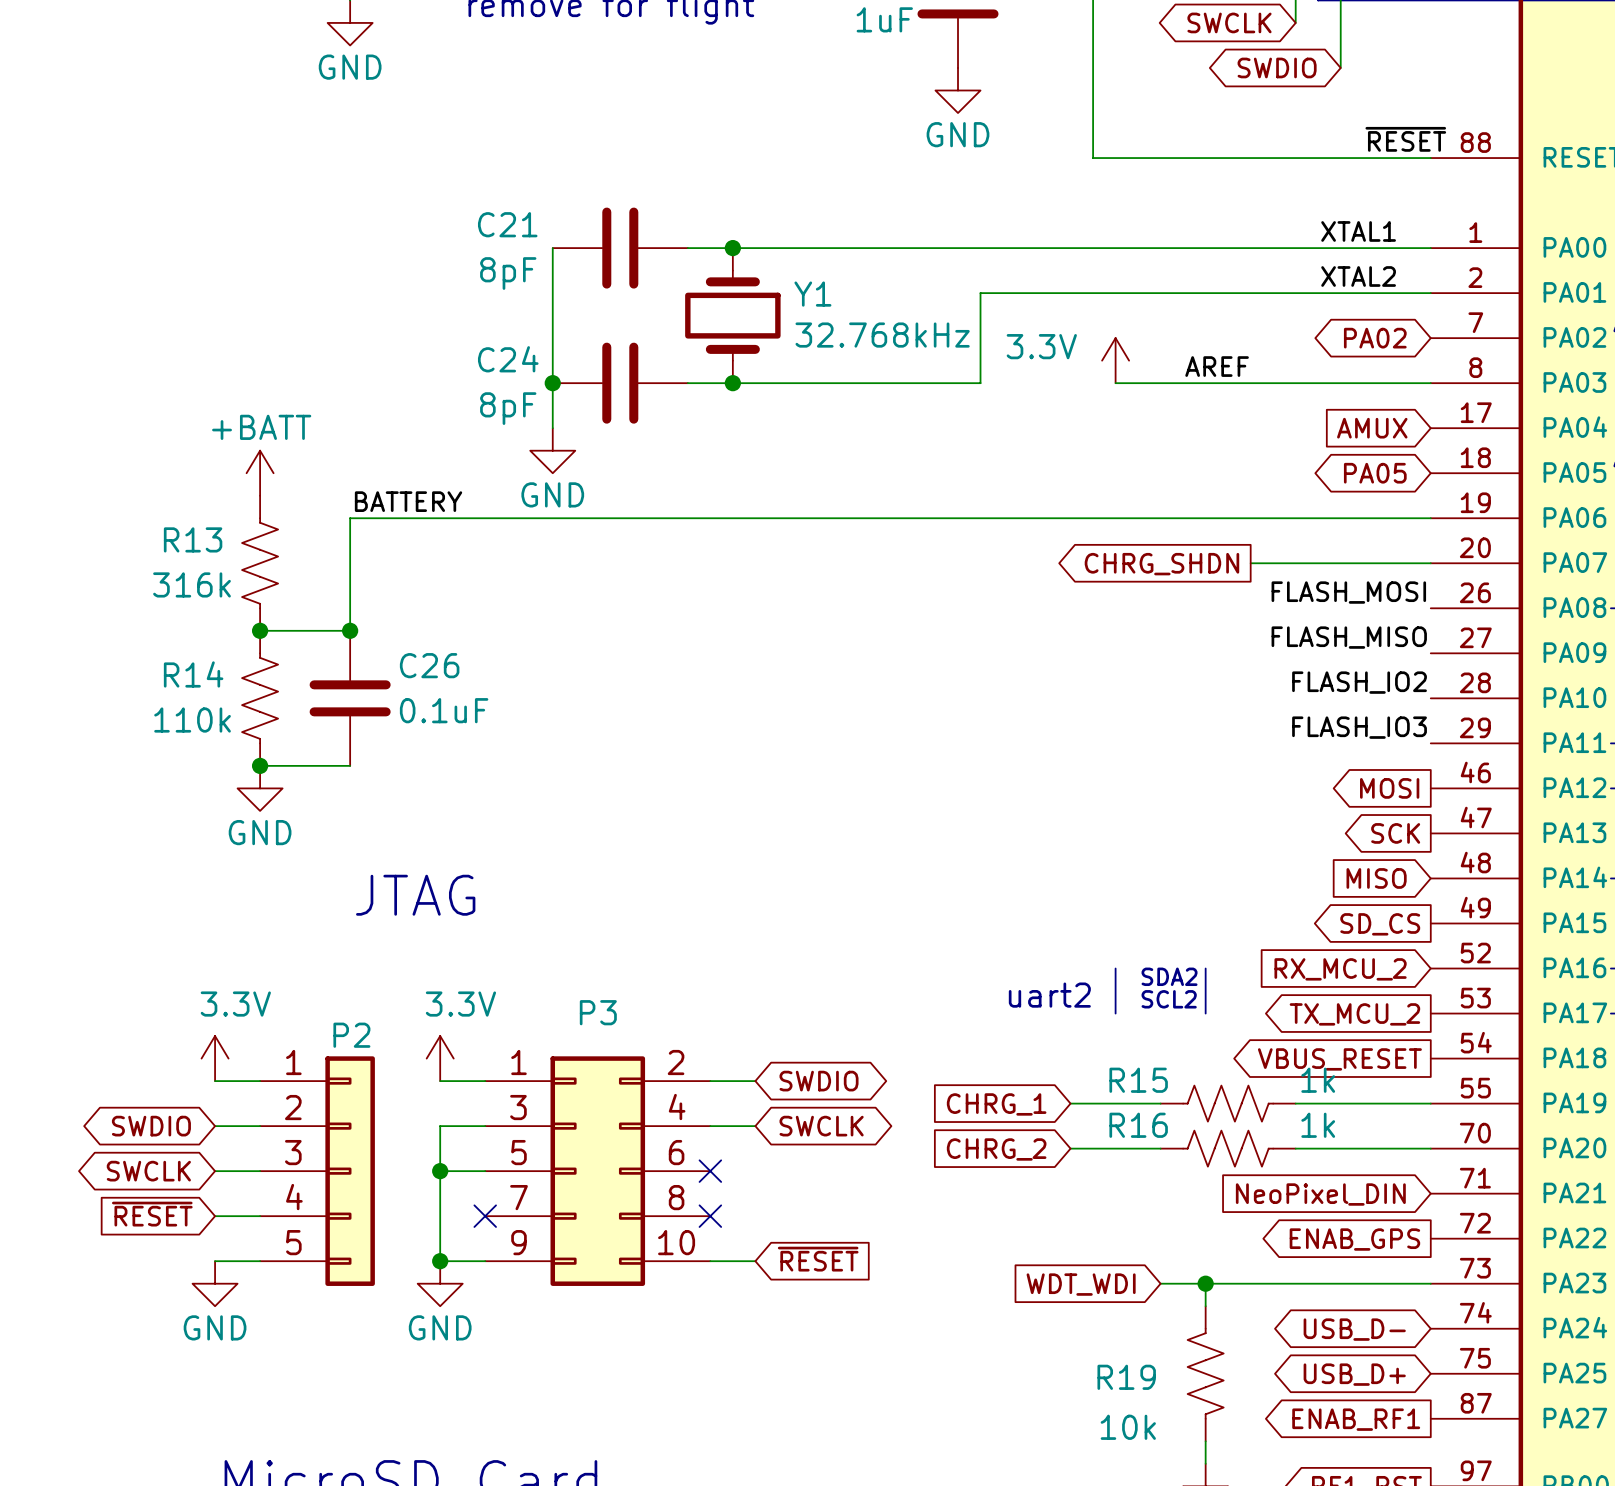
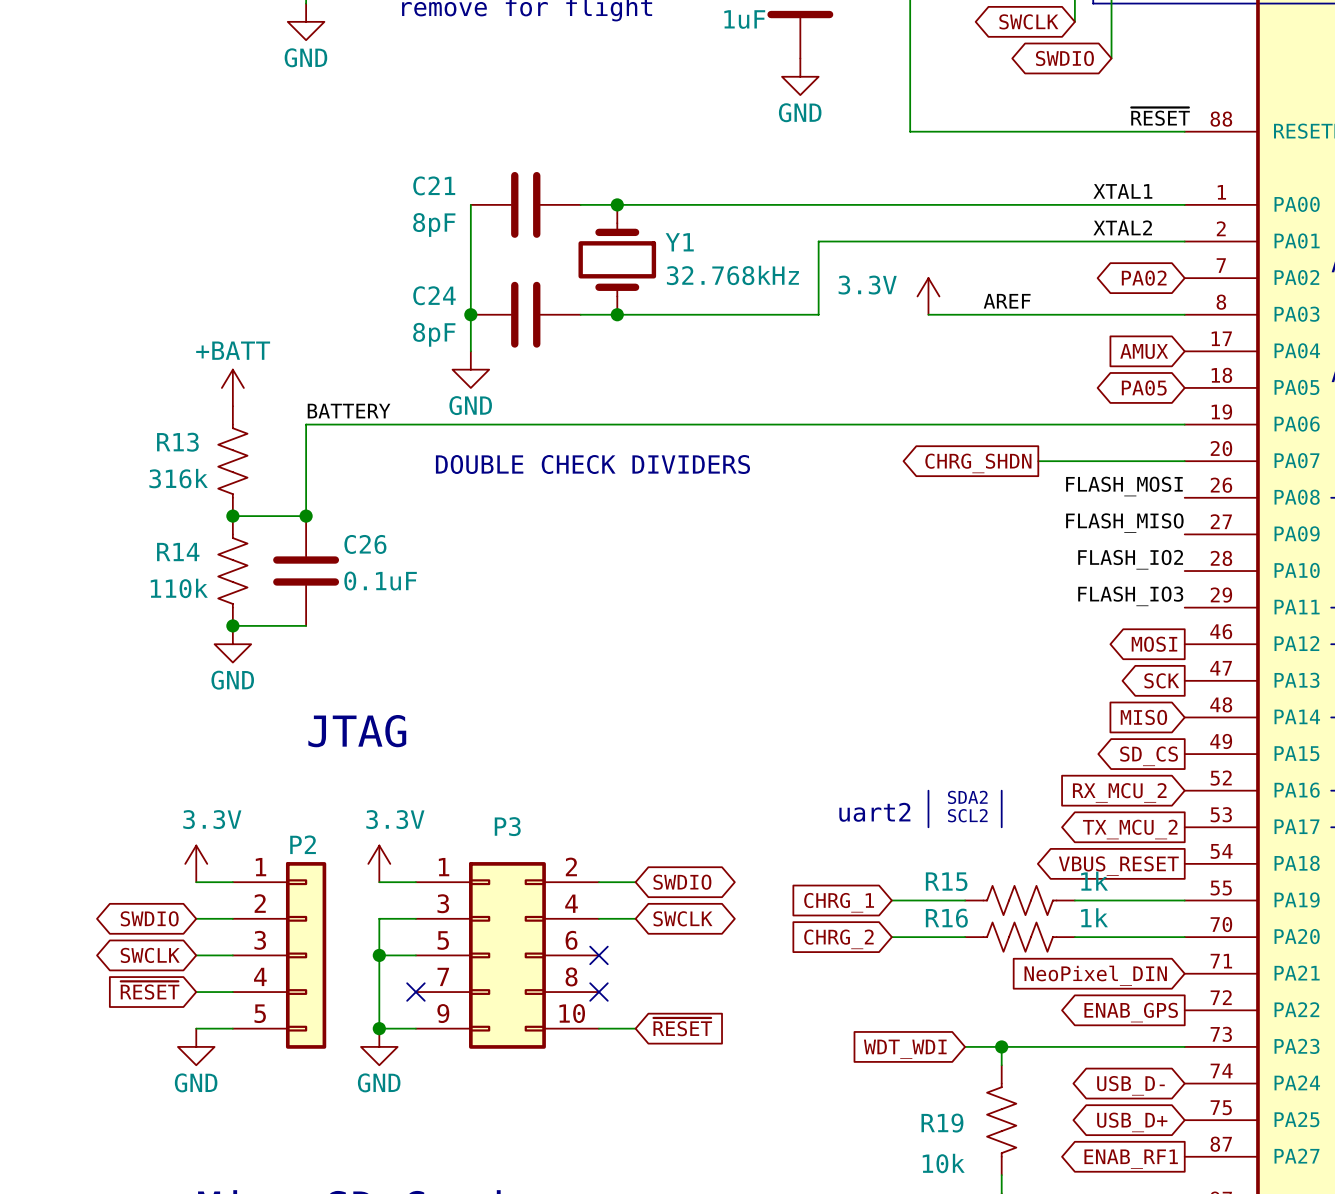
text: none -> DOUBLE CHECK DIVIDERS (592, 464)

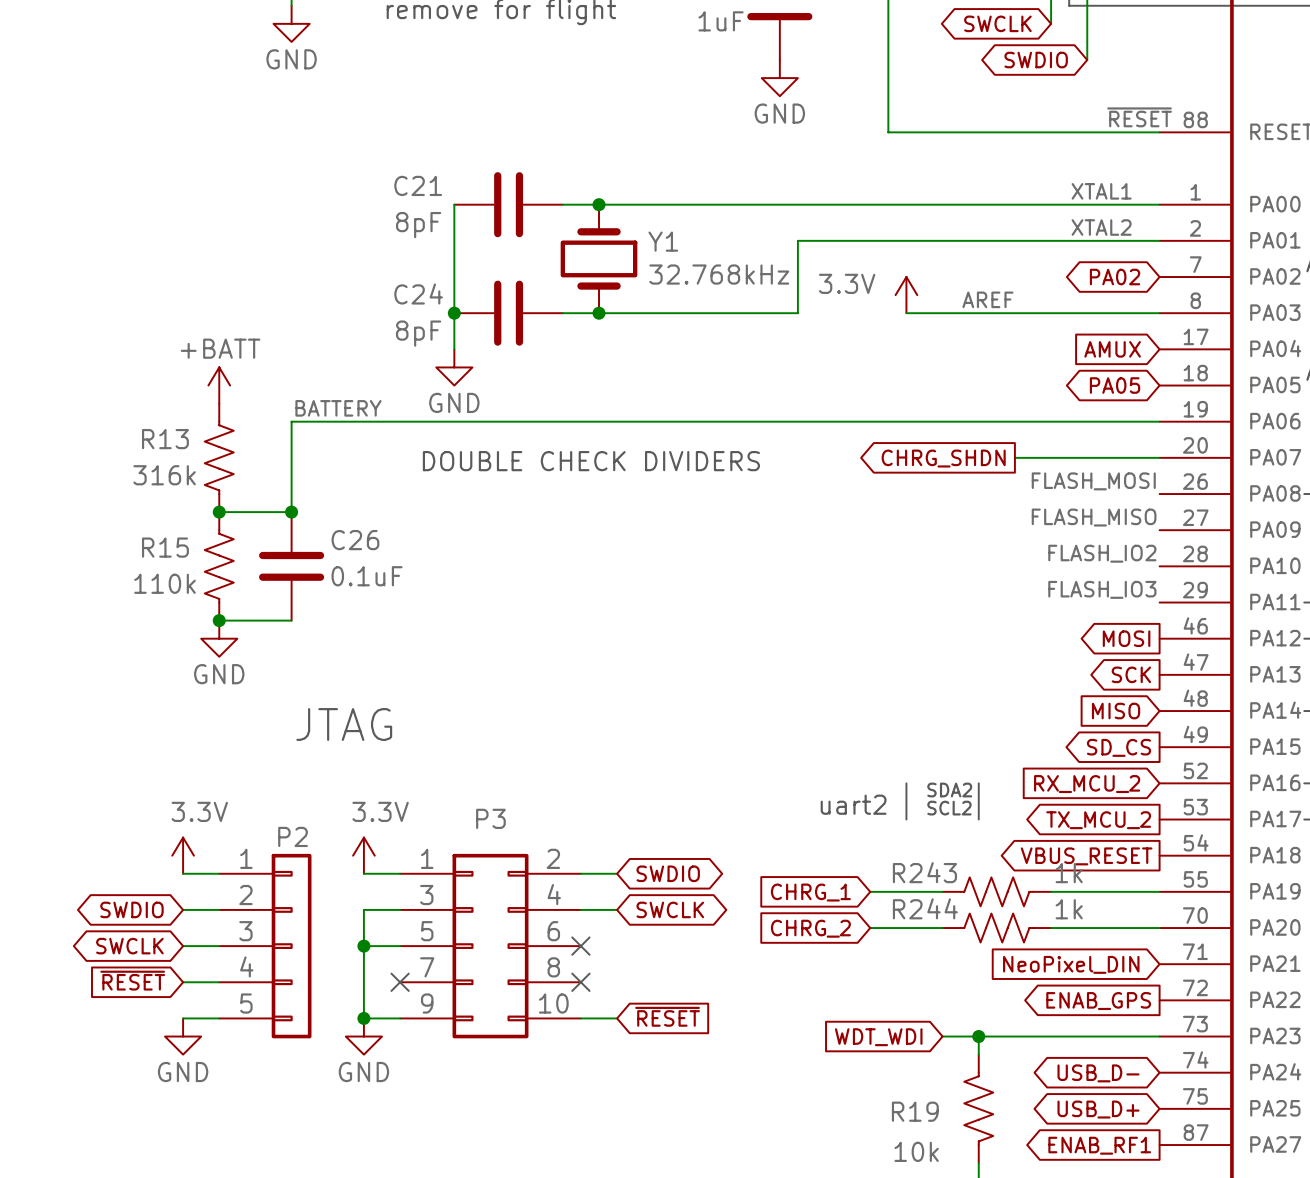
R14 name: R14 (178, 552) -> R15 (165, 547)
R15 name: R15 (946, 881) -> R243 (924, 872)
R16 name: R16 (946, 918) -> R244 (925, 908)

